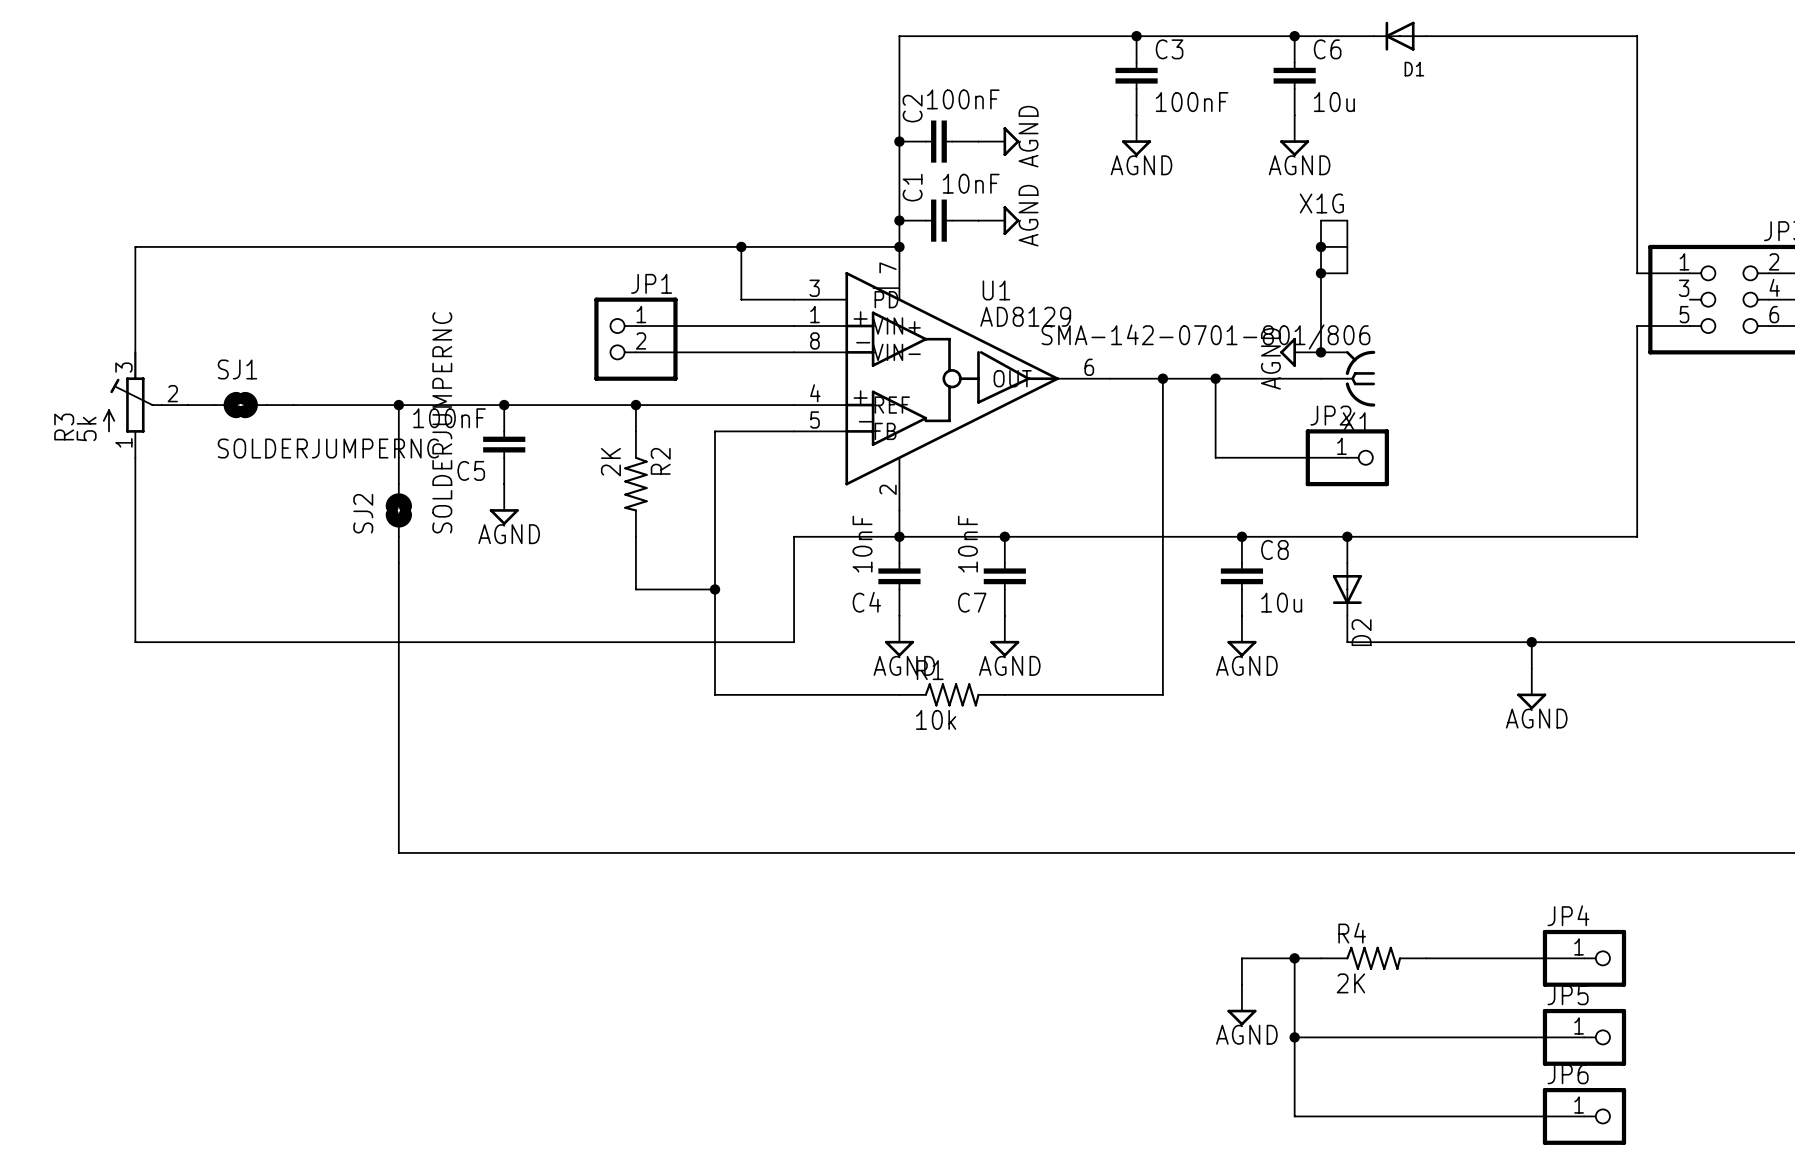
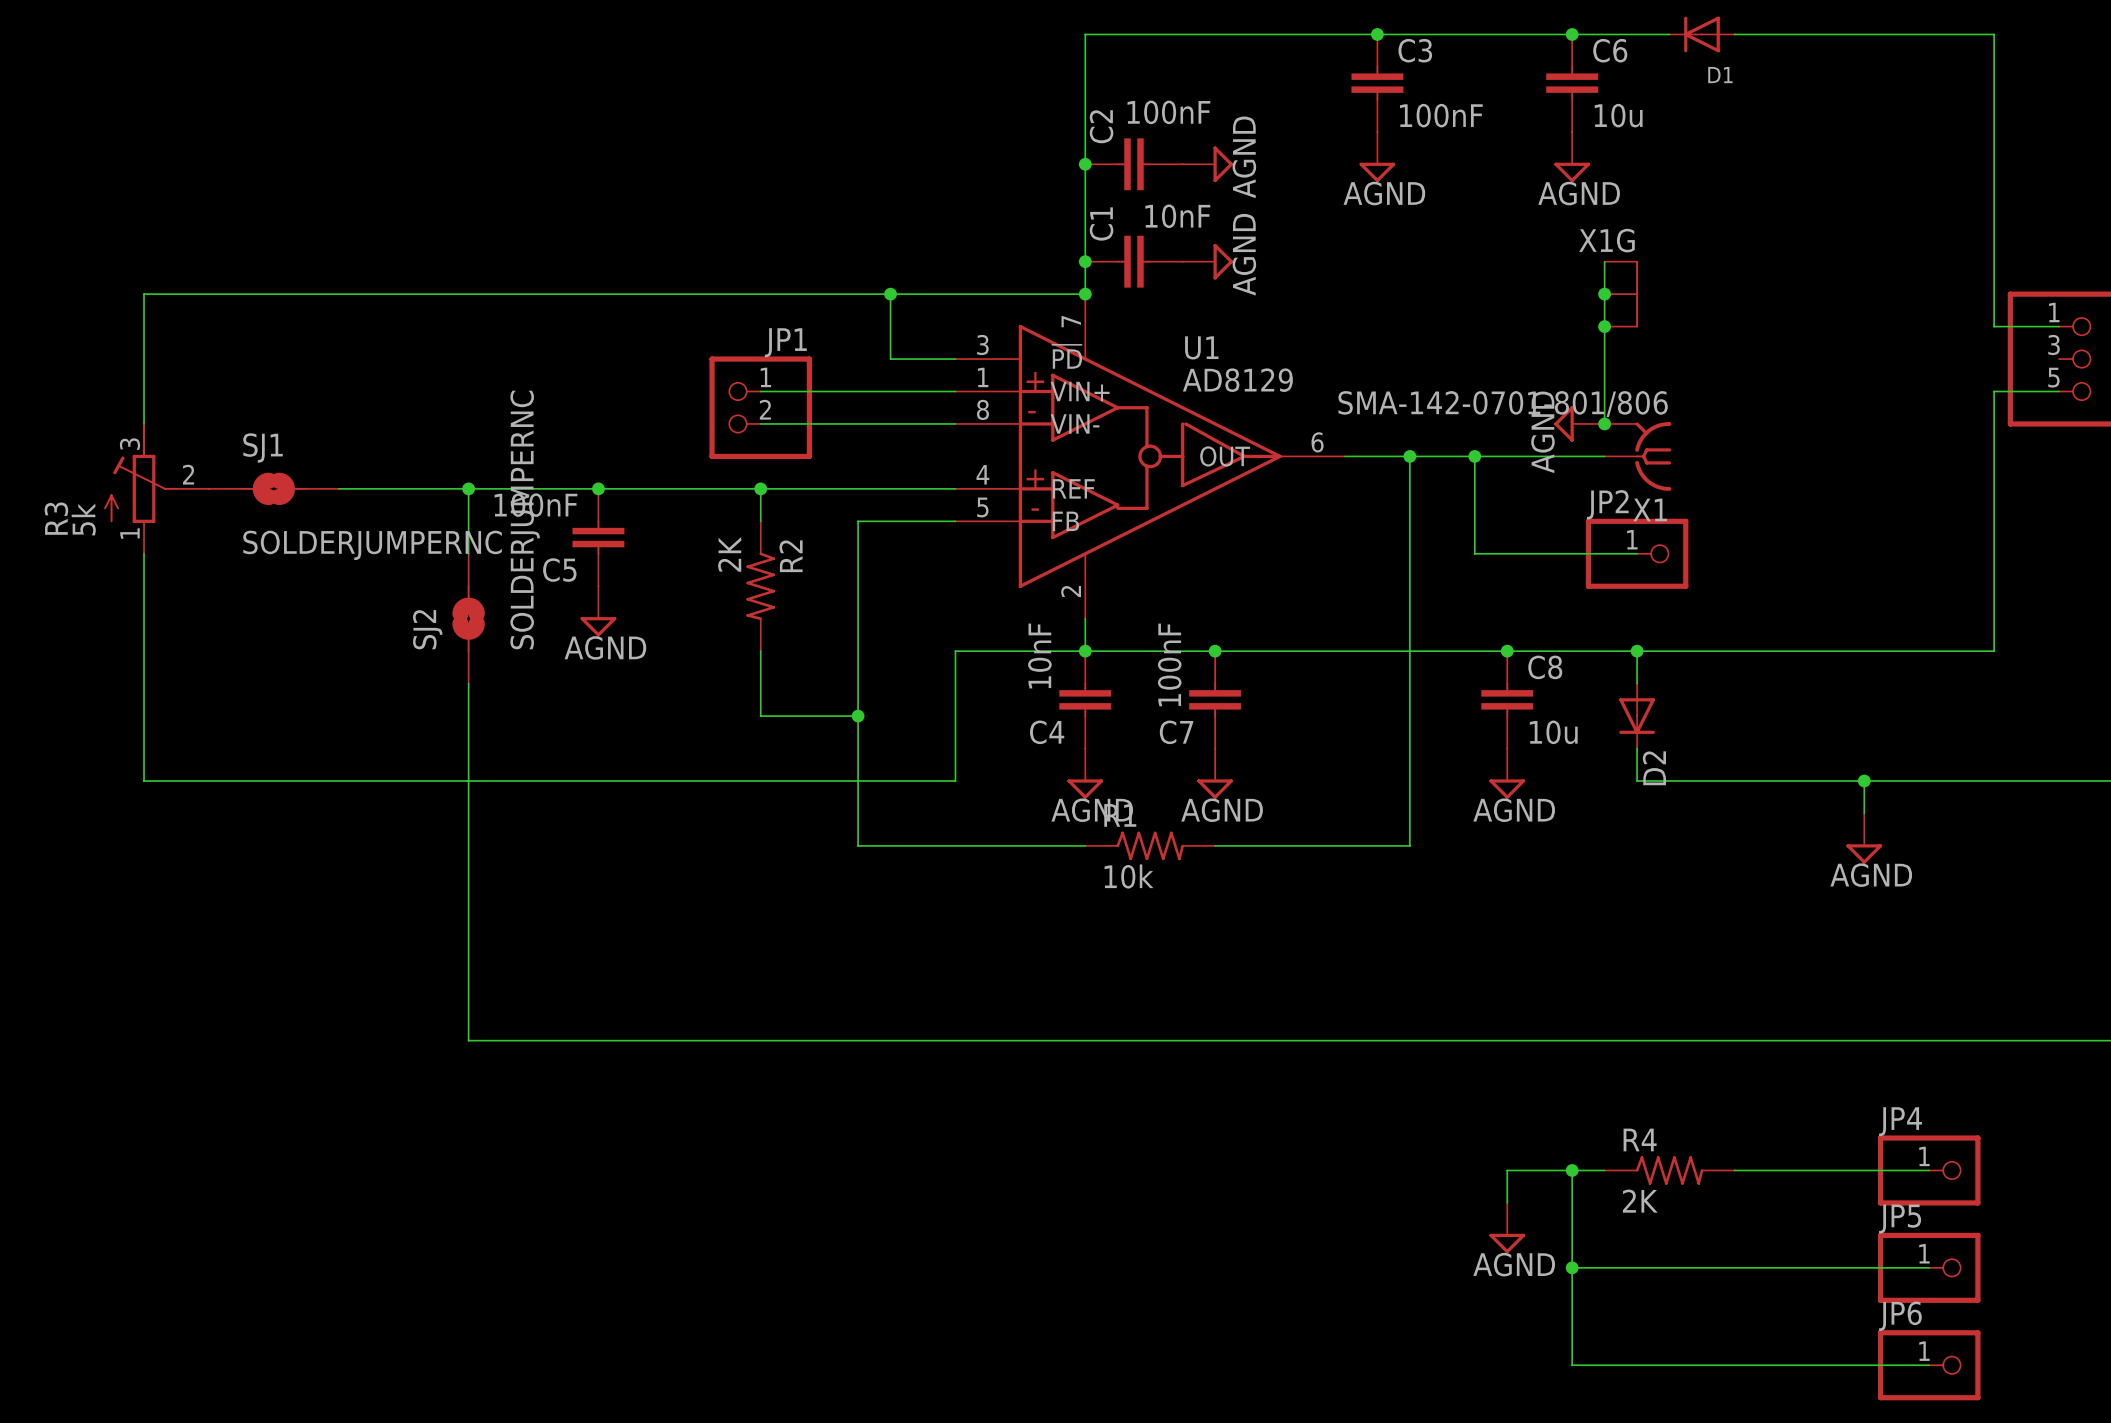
C7 value: 10nF (967, 544) -> 100nF (1169, 664)

